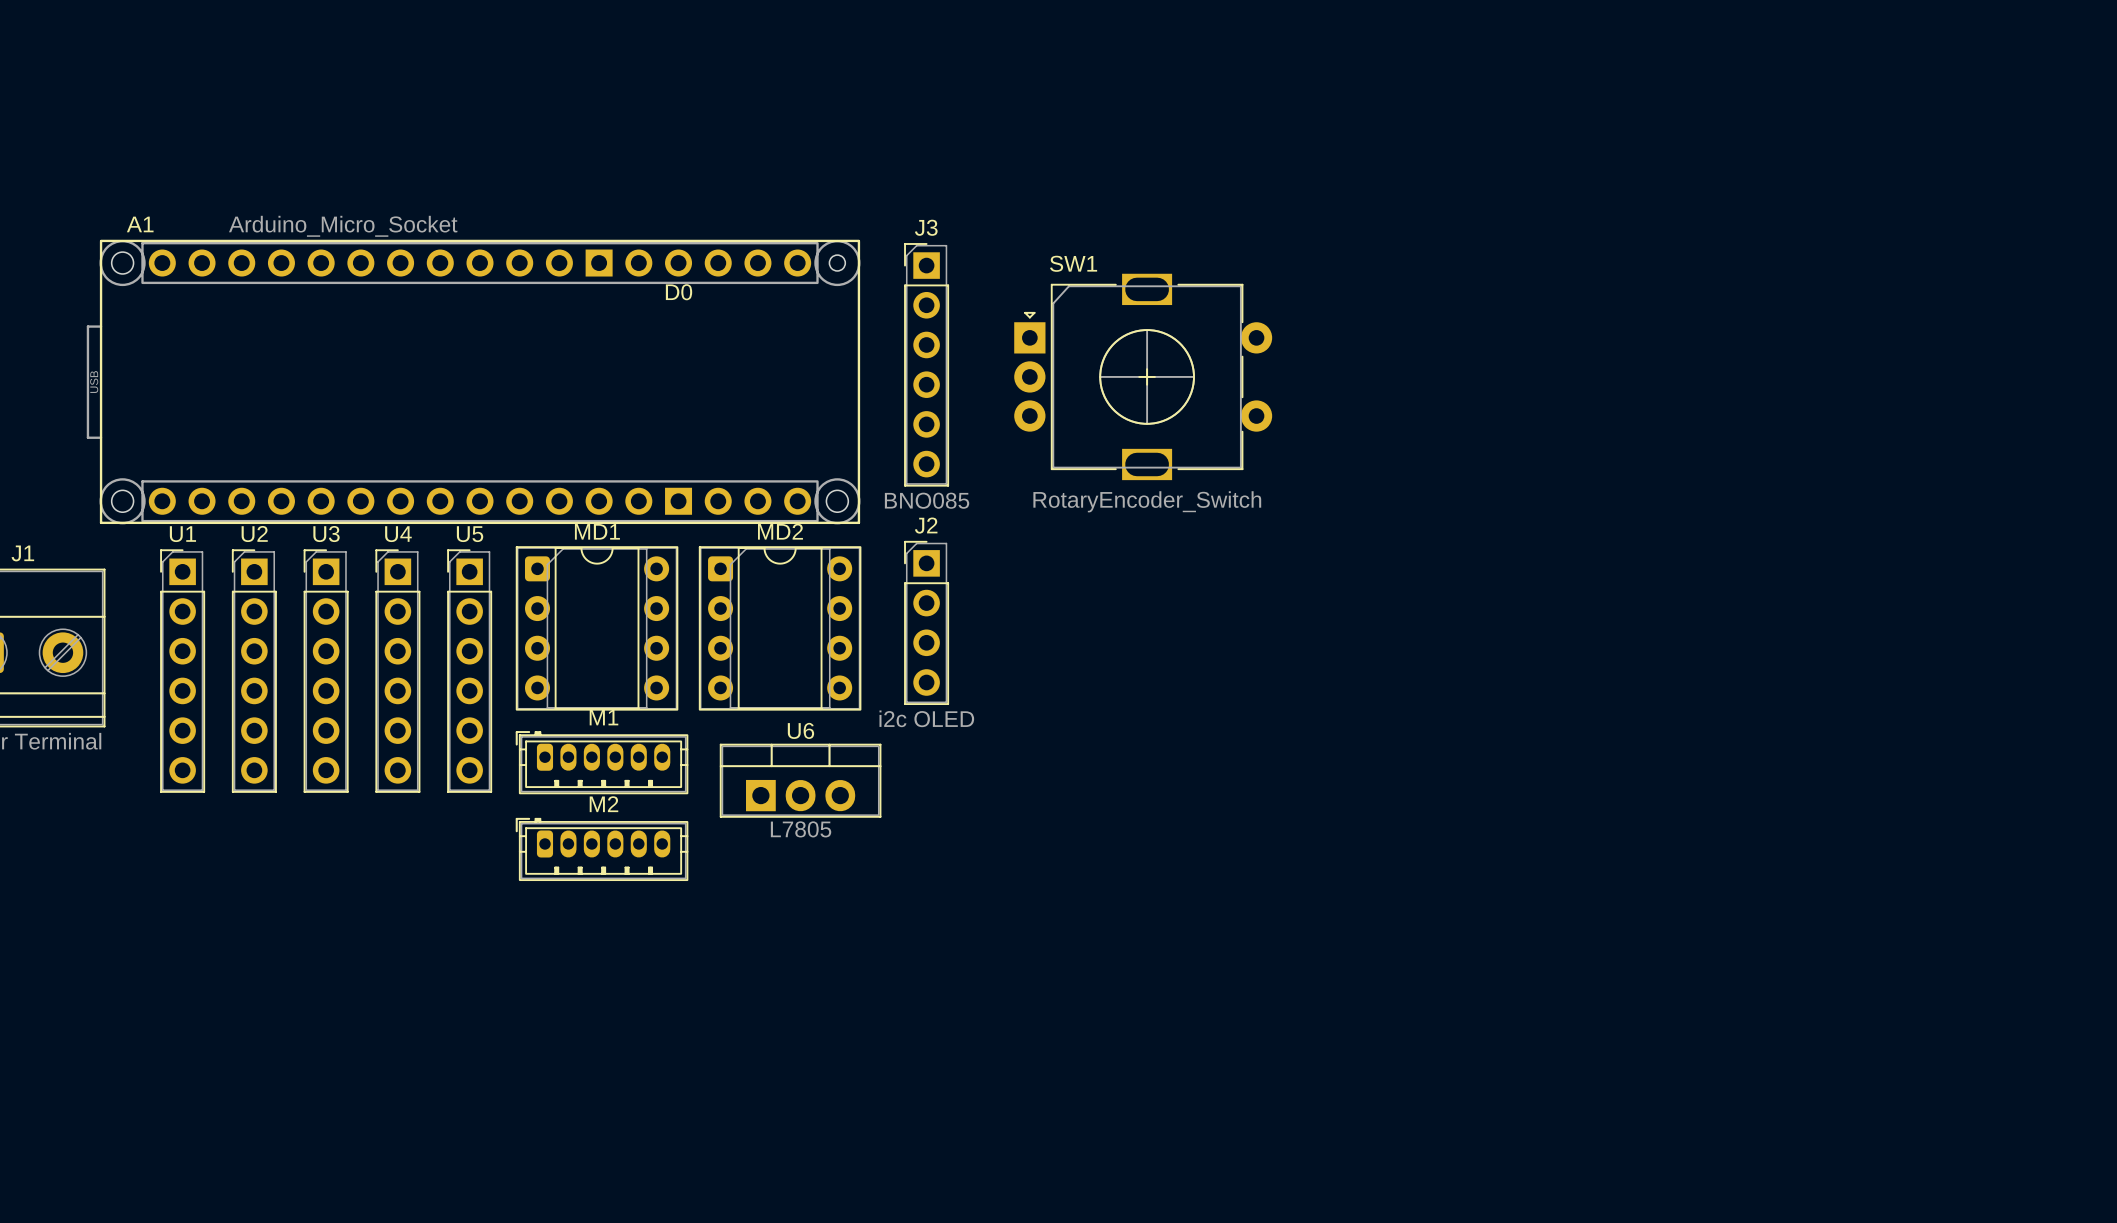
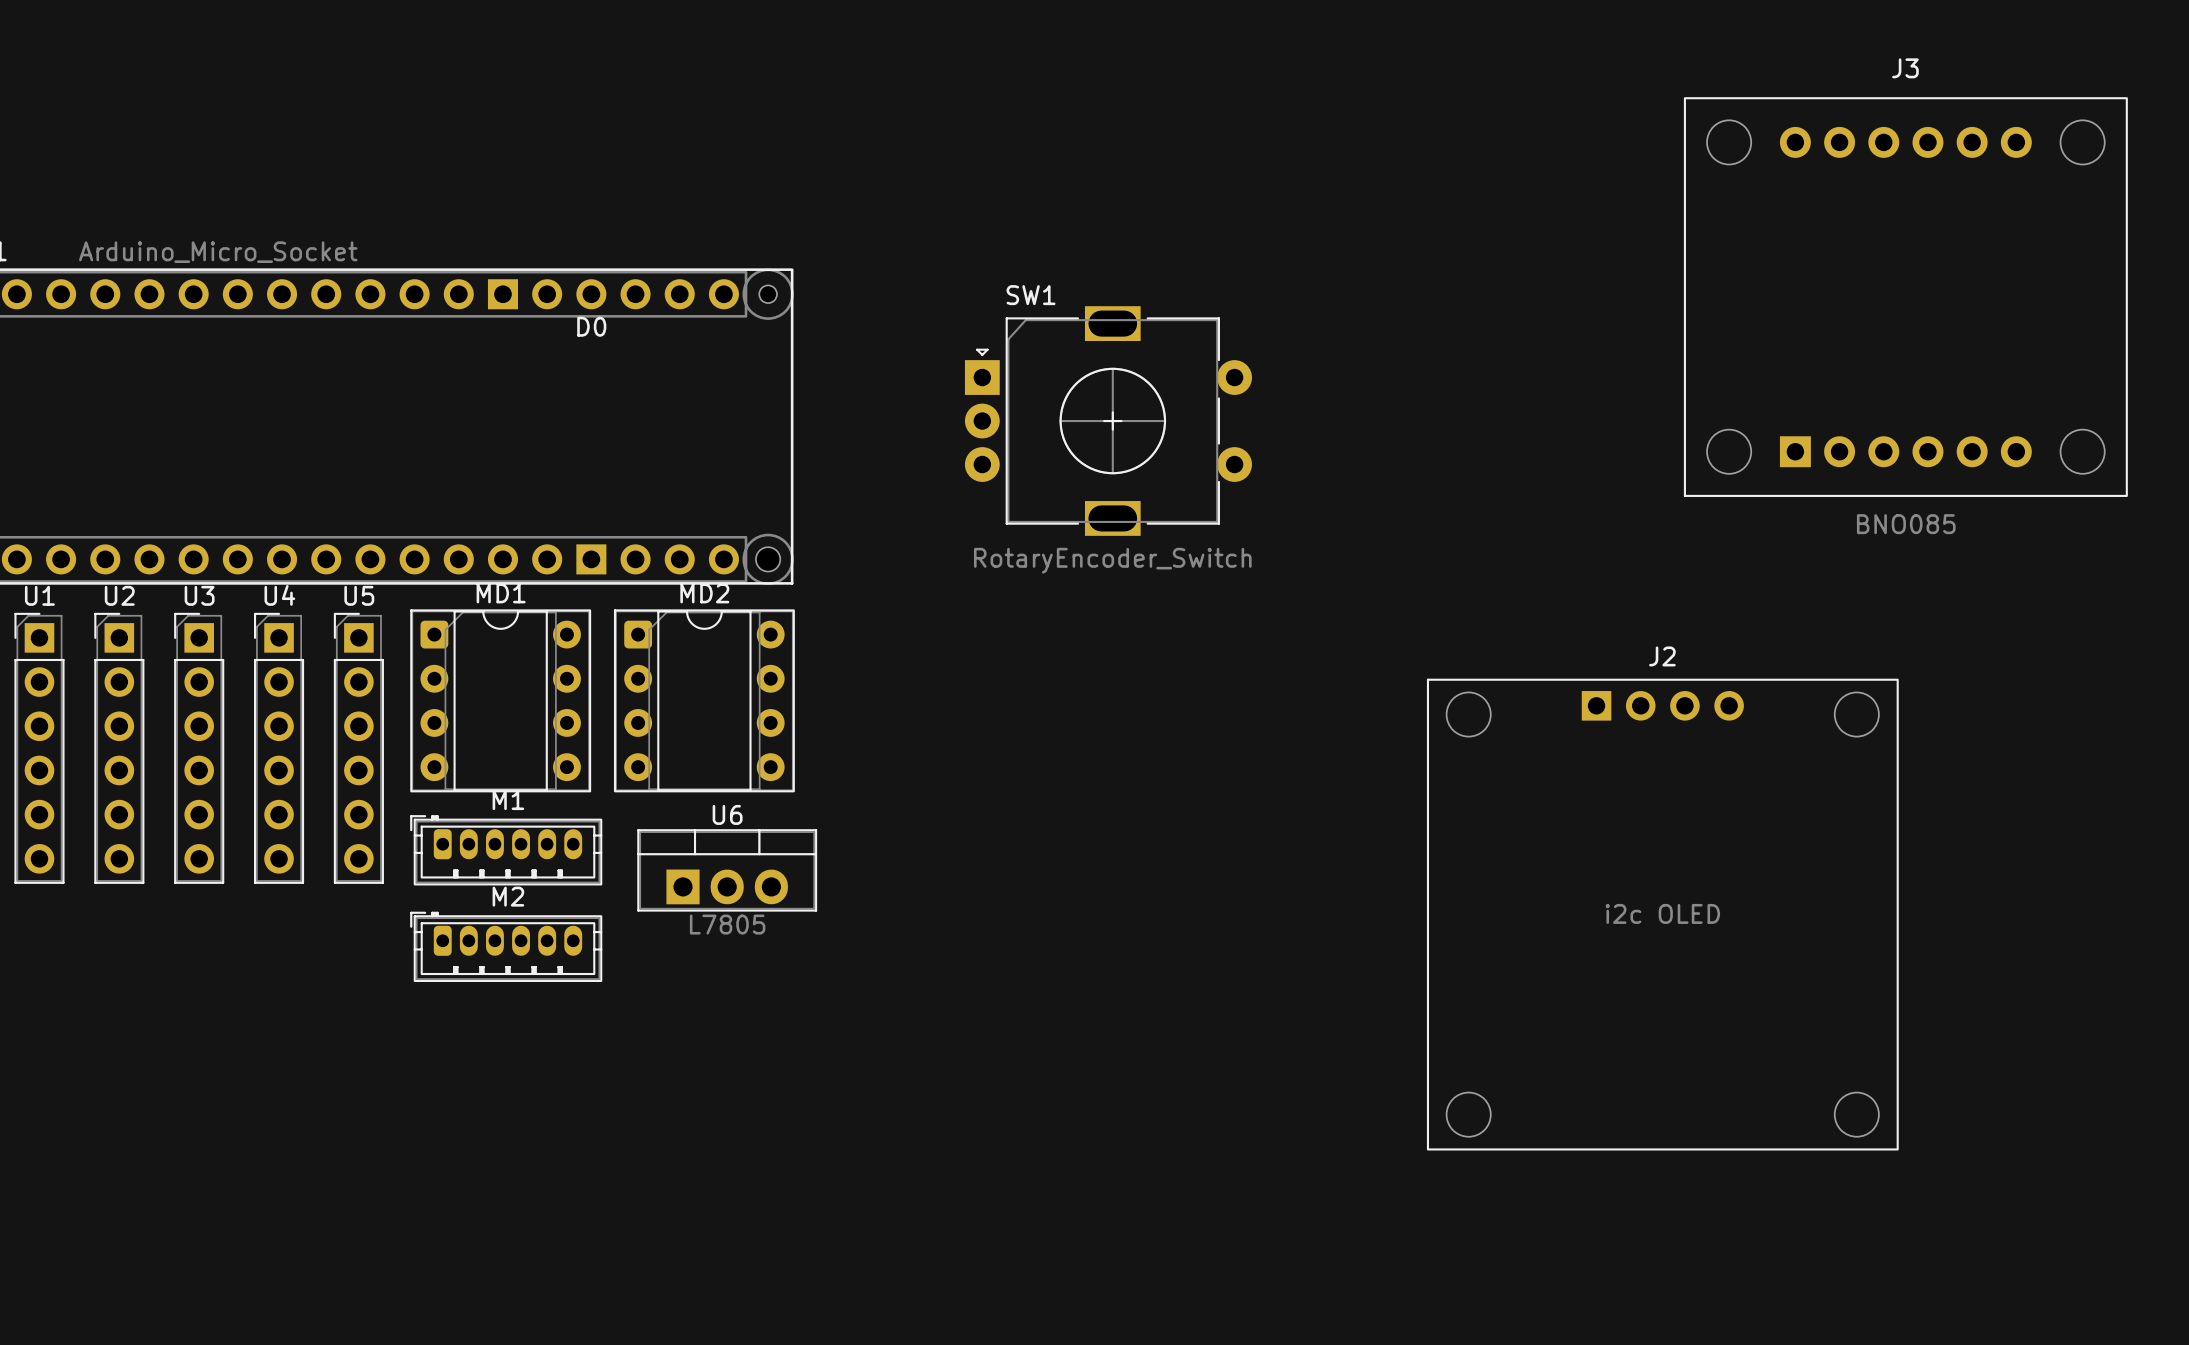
J3 name position: J3 (926, 227) -> J3 (1905, 68)
J3 footprint: [904, 243, 950, 487] -> [1683, 97, 2128, 497]
J3 value position: BNO085 (927, 500) -> BNO085 (1906, 524)
J2 name position: J2 (926, 525) -> J2 (1662, 656)
J2 footprint: [904, 540, 950, 706] -> [1426, 678, 1899, 1151]
J2 value position: i2c OLED (926, 718) -> i2c OLED (1662, 913)

